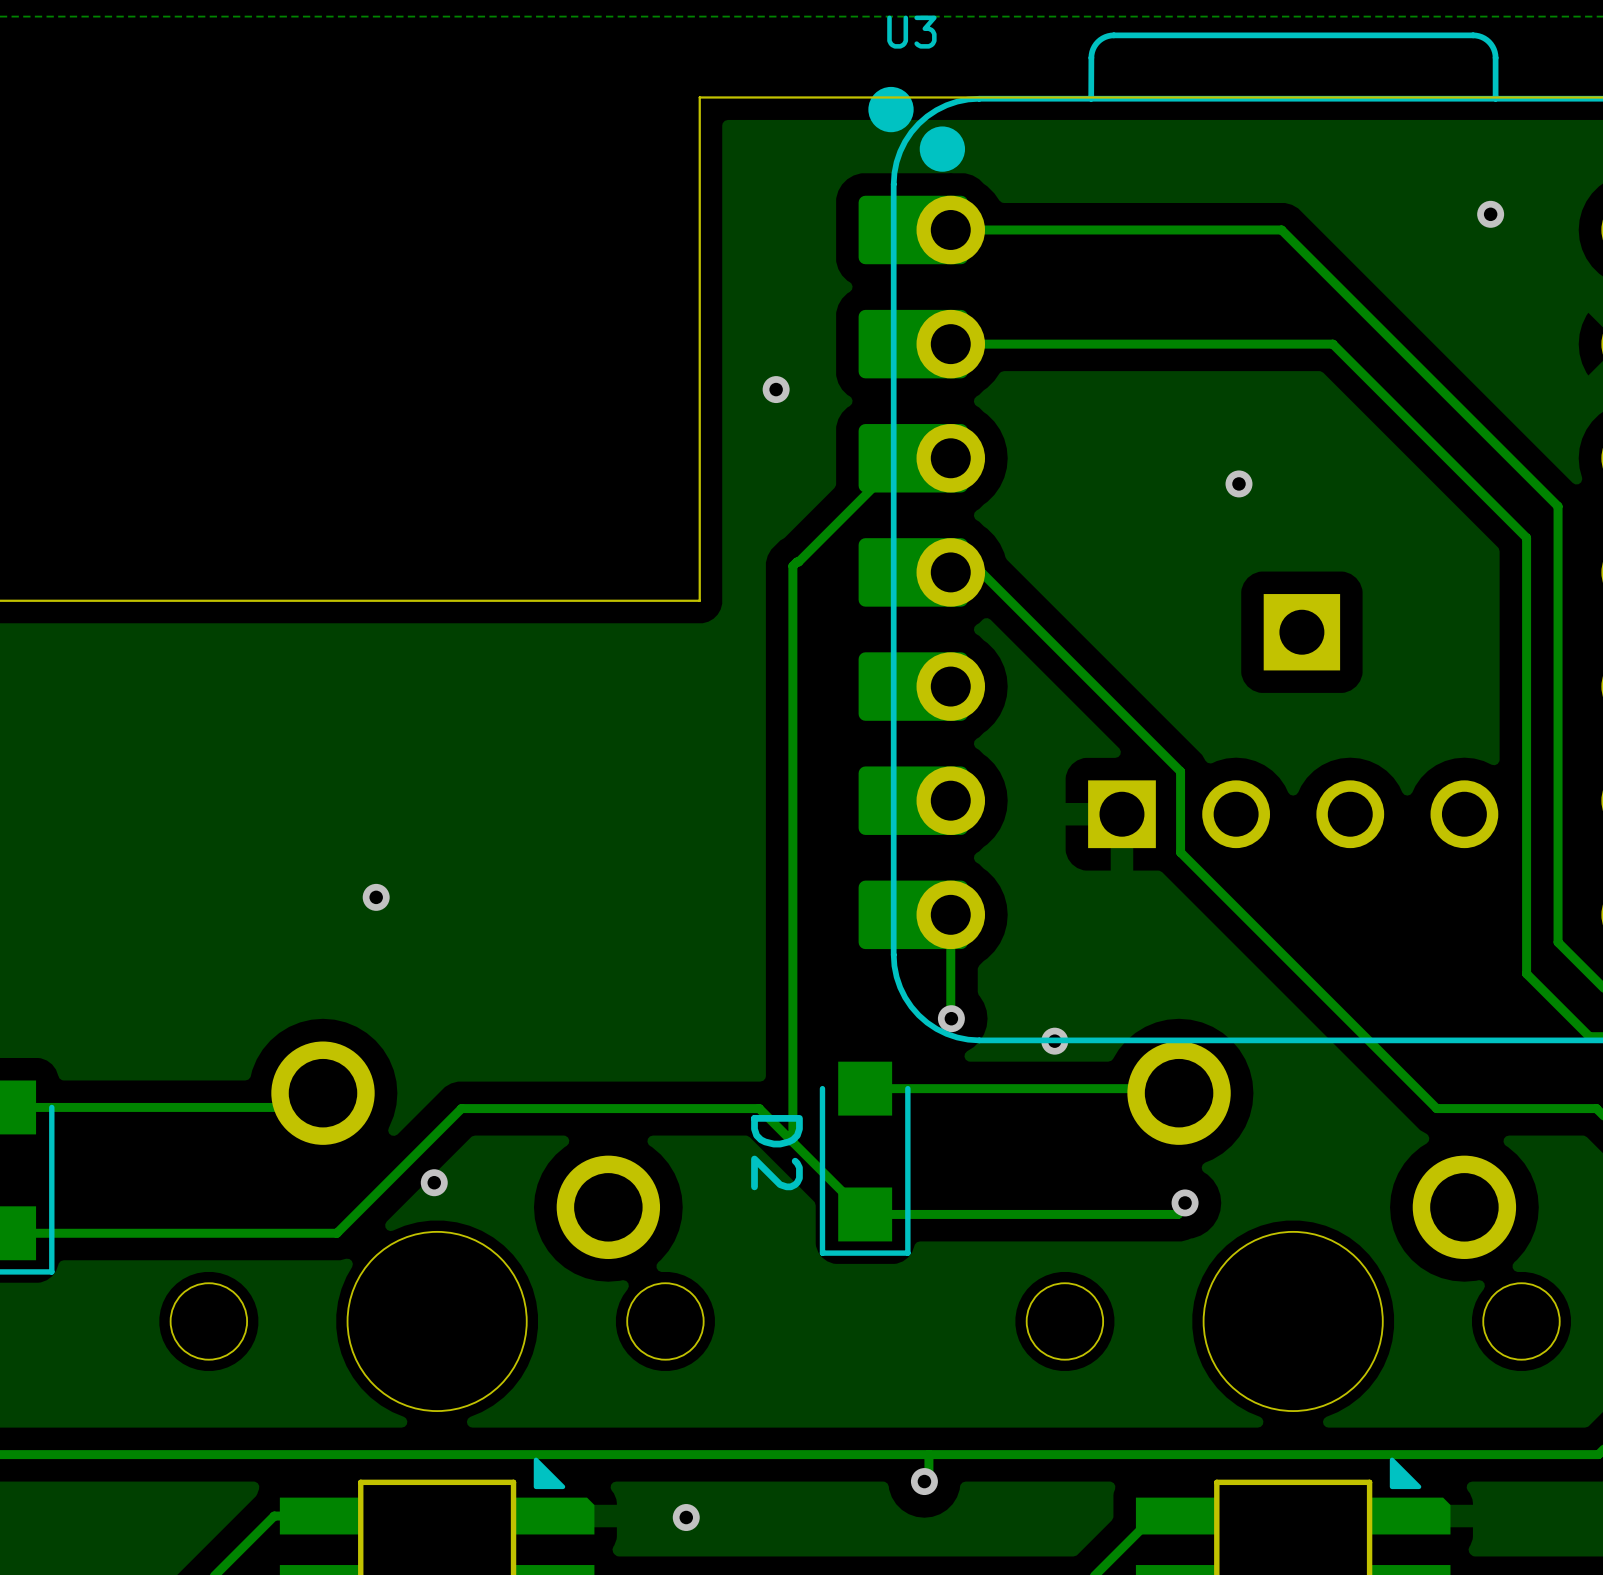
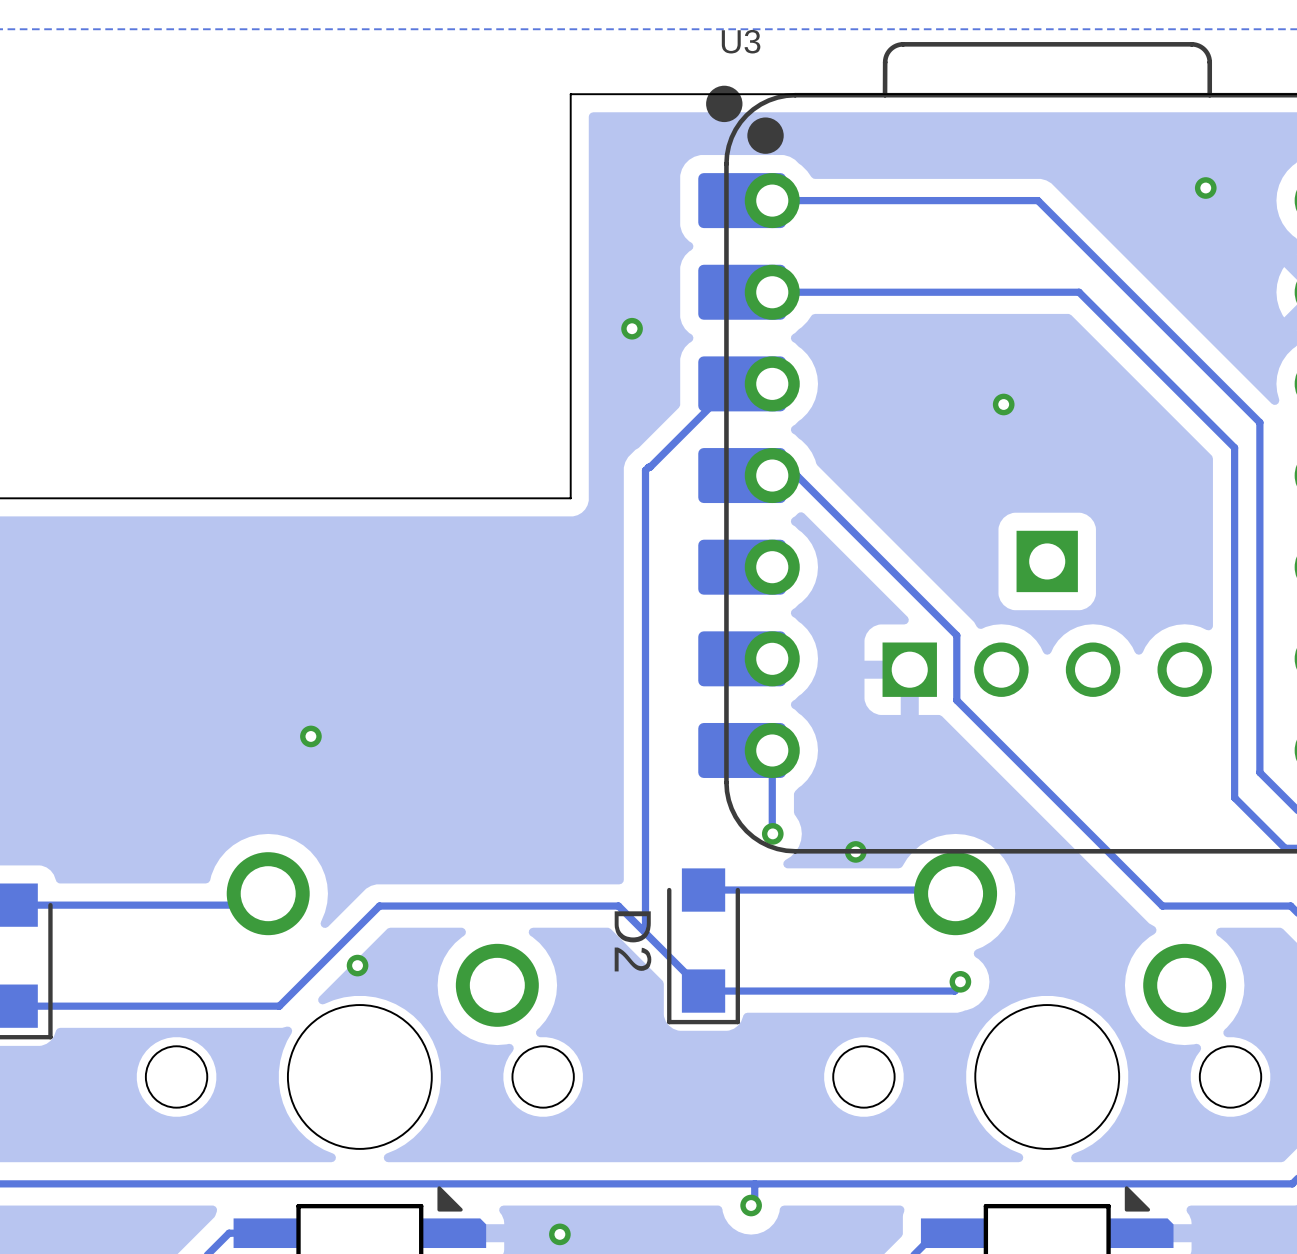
part position: (1301, 632) -> (1047, 561)

